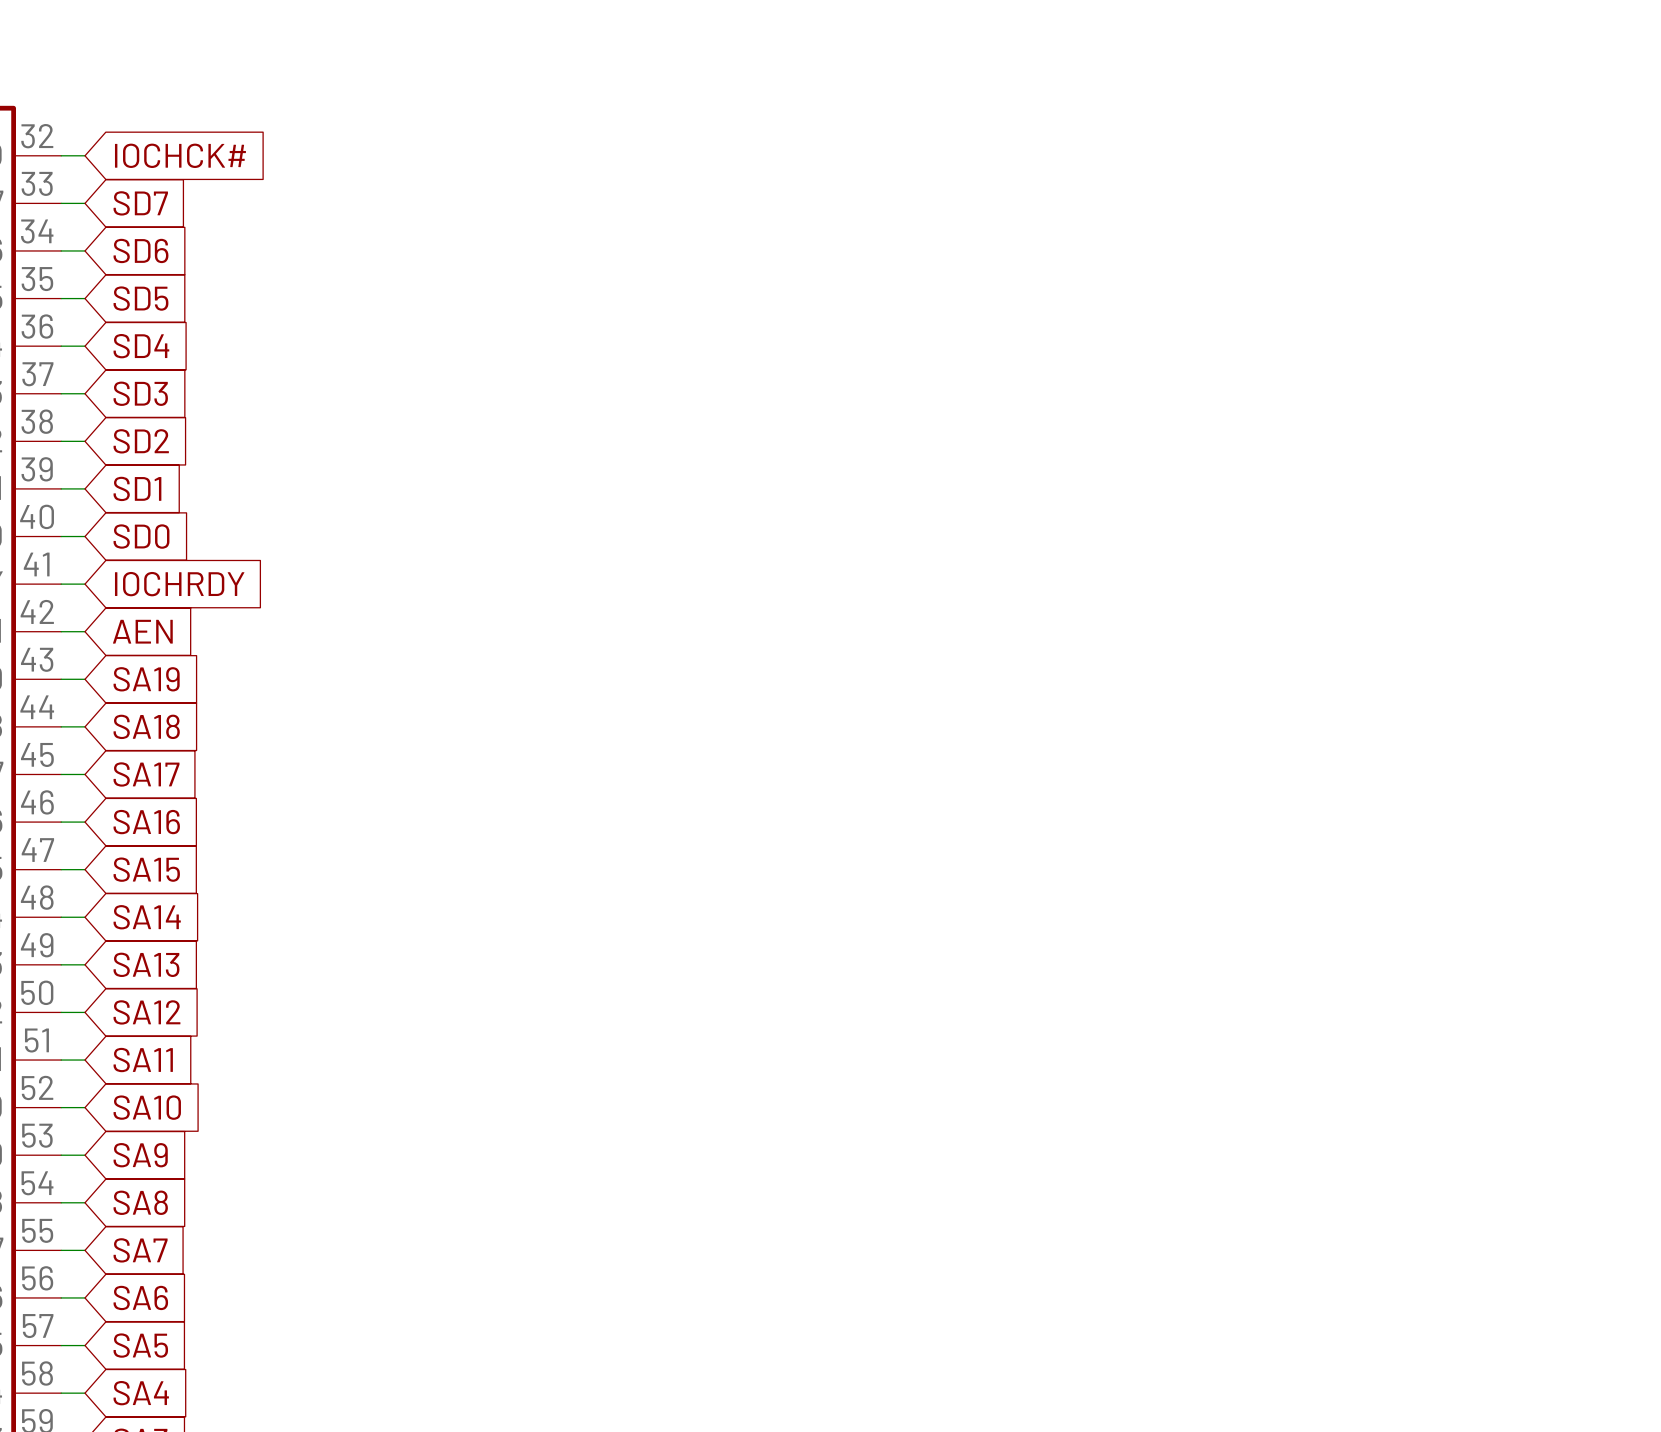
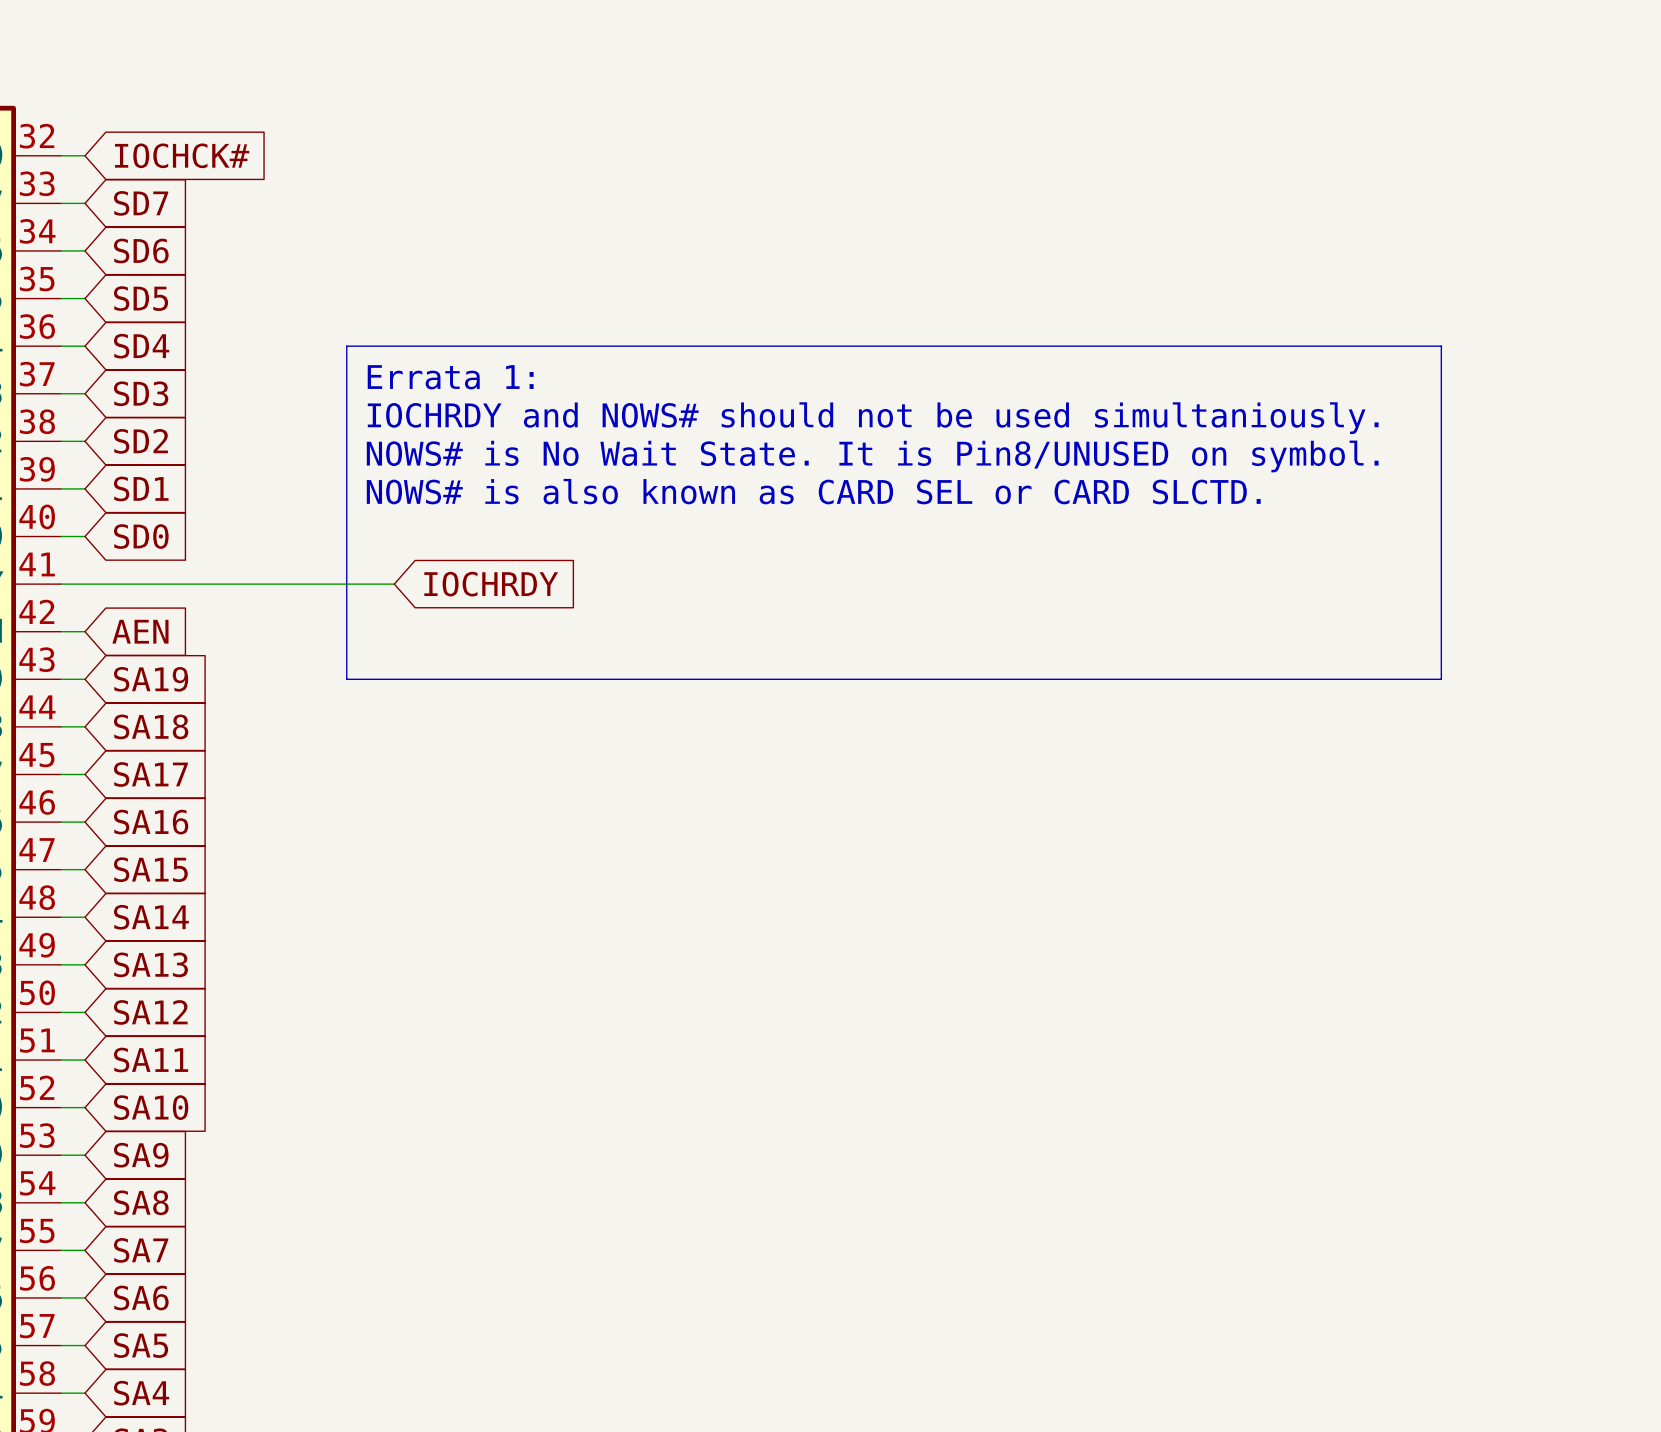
line: none -> (346, 346) (1441, 346) (1441, 679) (346, 679) (346, 346)
text: none -> Errata 1: (450, 377)
text: none -> IOCHRDY and NOWS# should not be used simultaniously. (873, 418)
text: none -> NOWS# is No Wait State. It is Pin8/UNUSED on symbol. (872, 456)
text: none -> NOWS# is also known as CARD SEL or CARD SLCTD. (813, 491)
wire: none -> (85, 584) (394, 584)
global label position: IOCHRDY (179, 584) -> IOCHRDY (491, 584)

